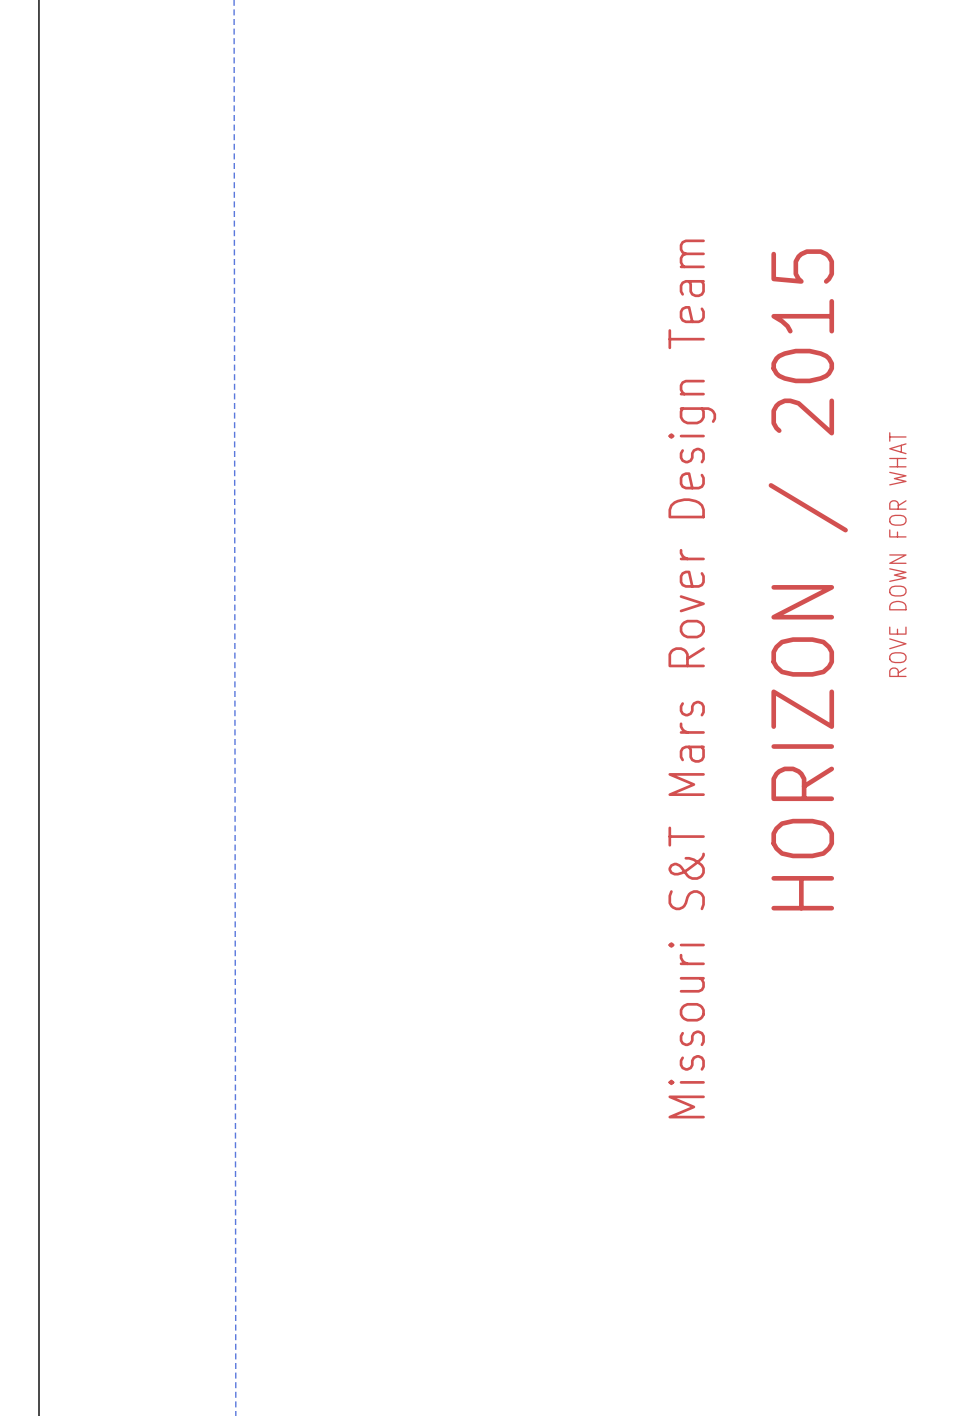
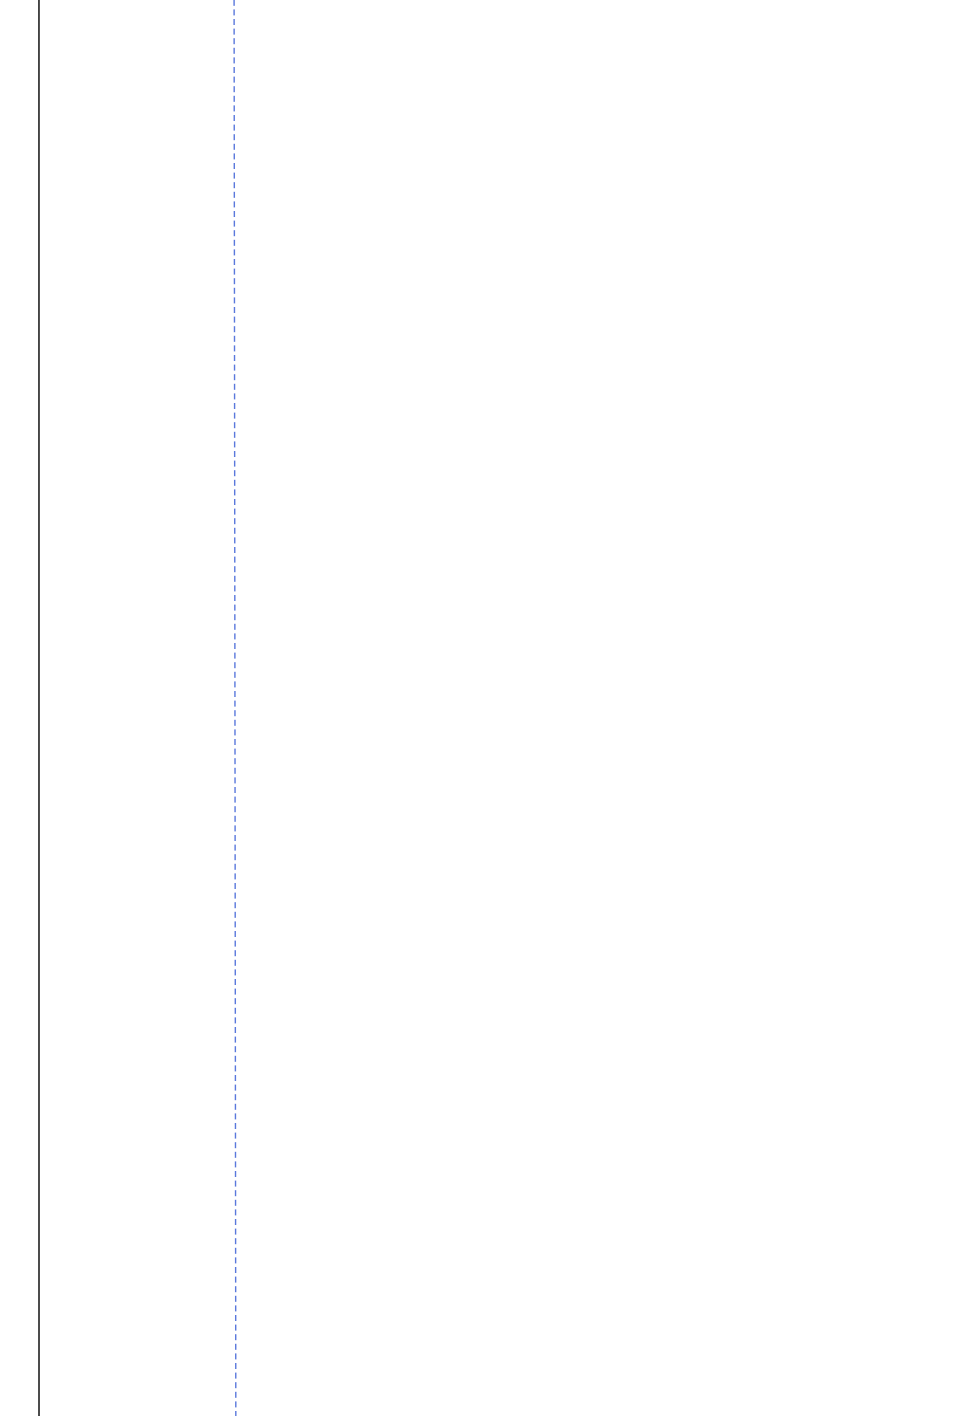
text: ROVE DOWN FOR WHAT (897, 554) -> none
text: HORIZON / 2015 (808, 579) -> none
text: Missouri S&T Mars Rover Design Team (692, 678) -> none

